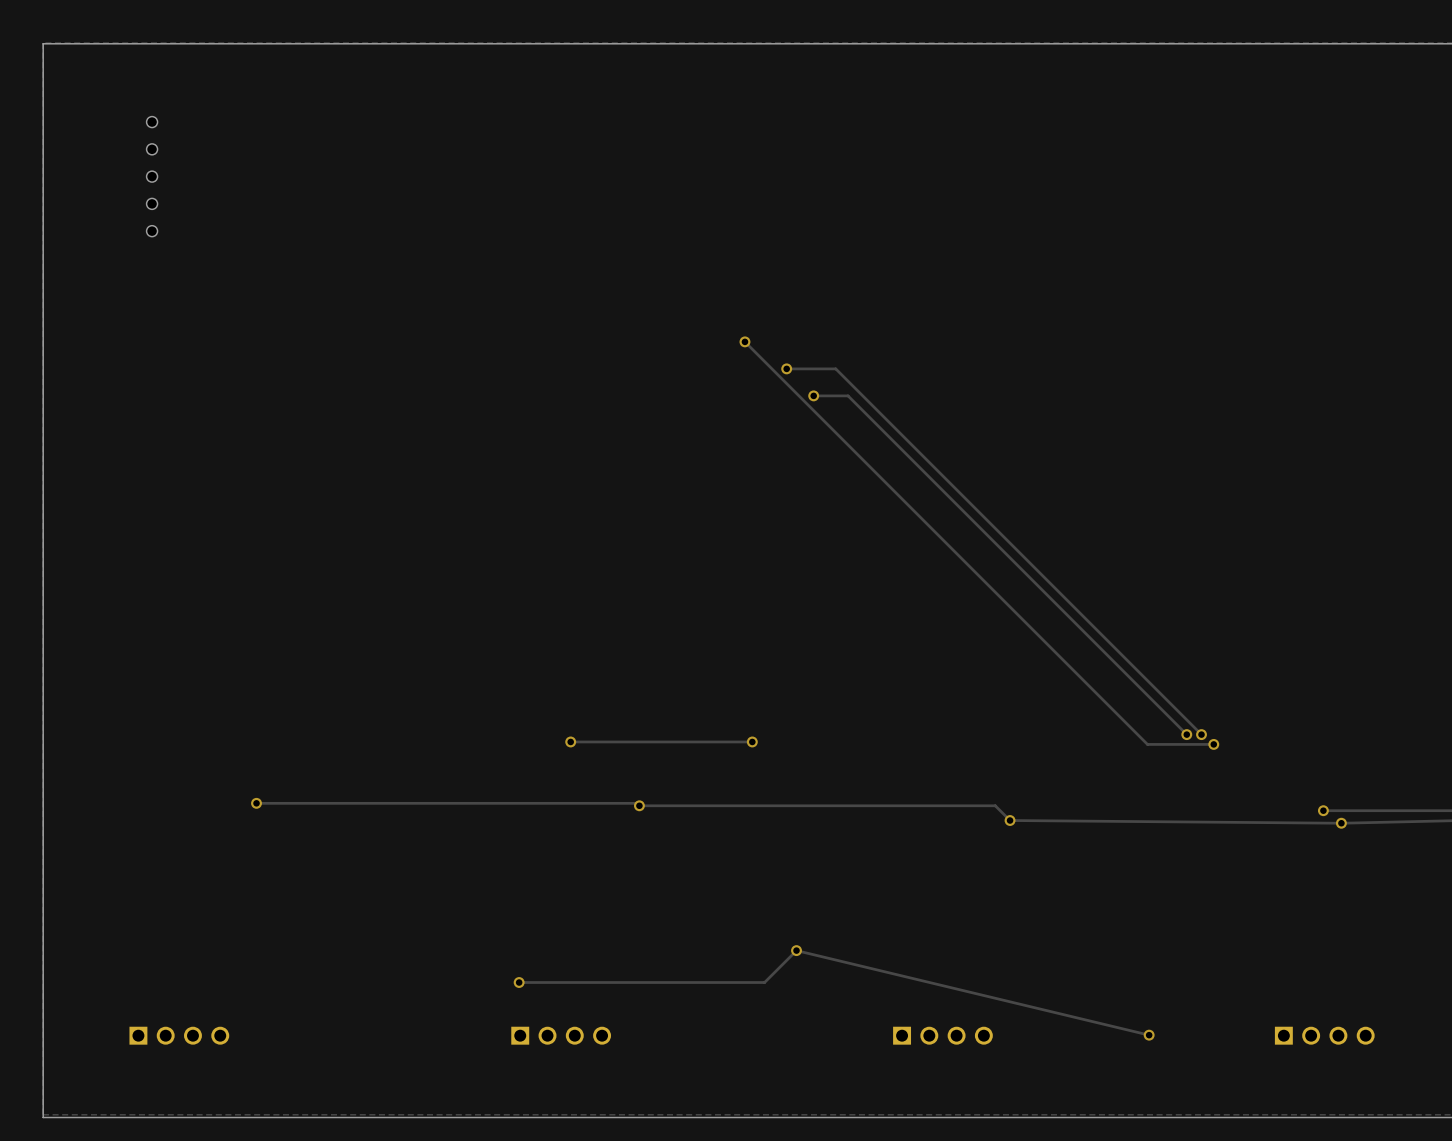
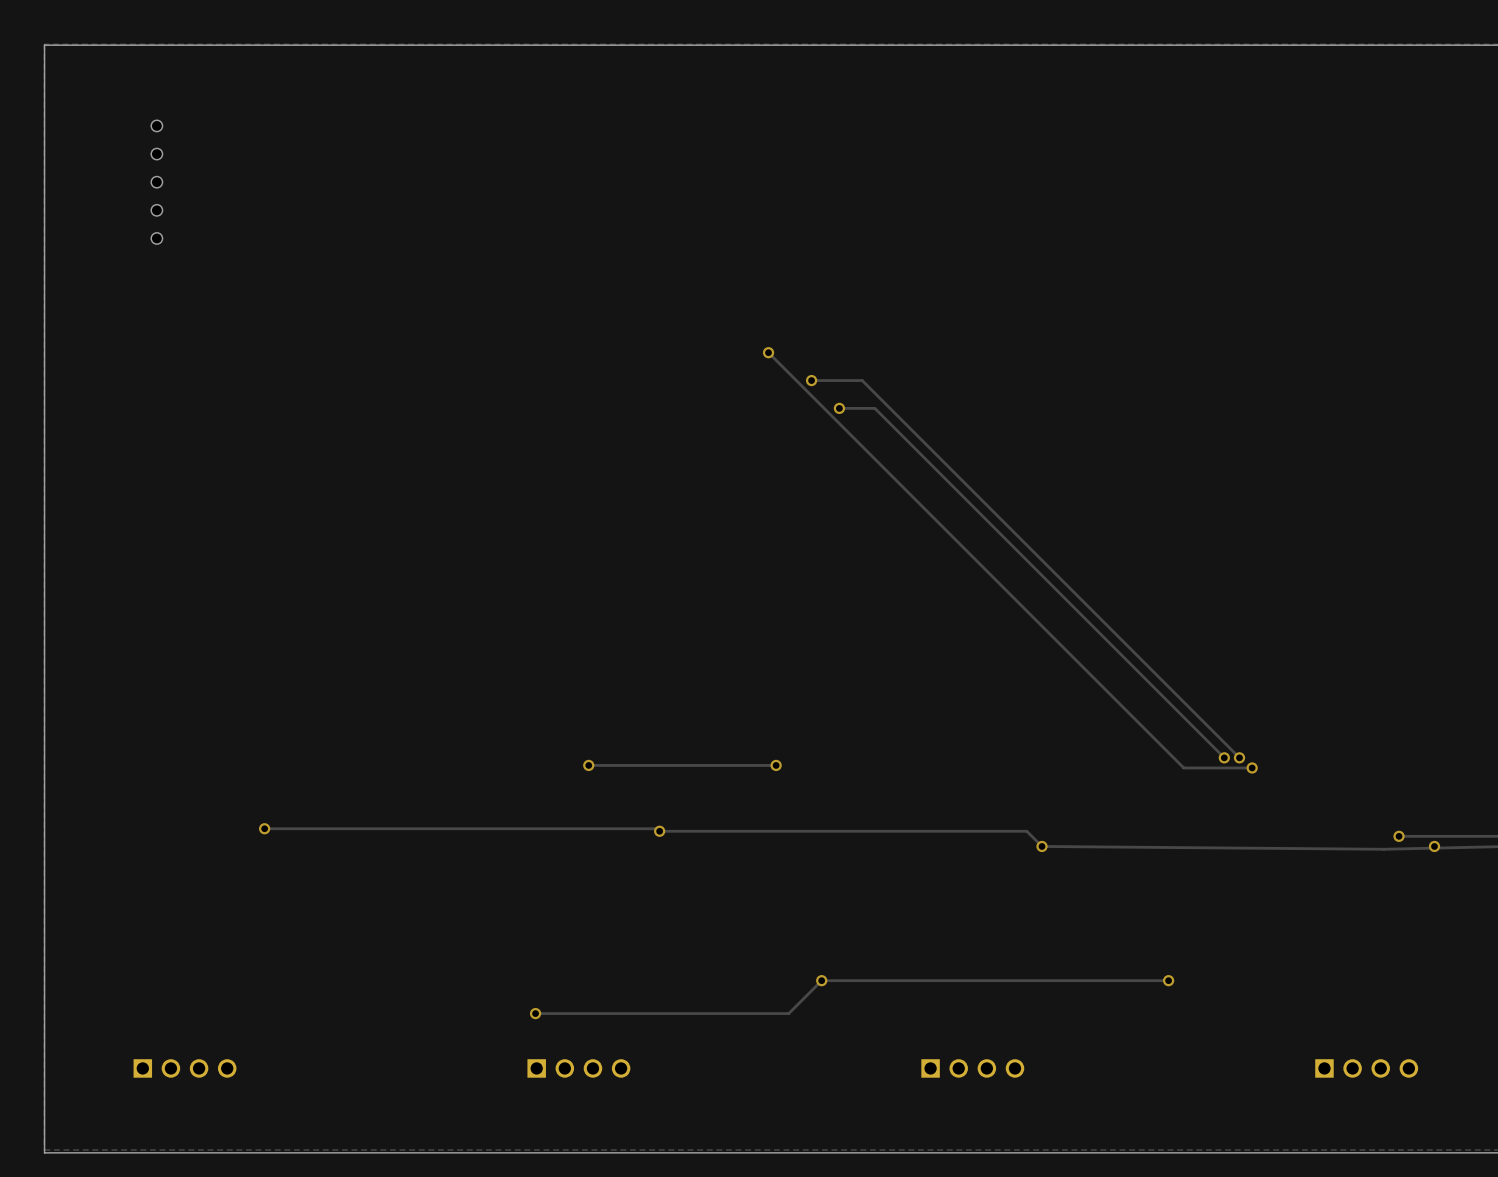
via: (1323, 810) -> none
track: (1356, 810) (1323, 810) -> none
via: none -> (1399, 836)
via: none -> (1434, 846)
via: (1341, 823) -> none
track: (796, 950) (1149, 1035) -> (821, 980) (1168, 980)
via: none -> (1168, 980)
via: (1149, 1035) -> none

